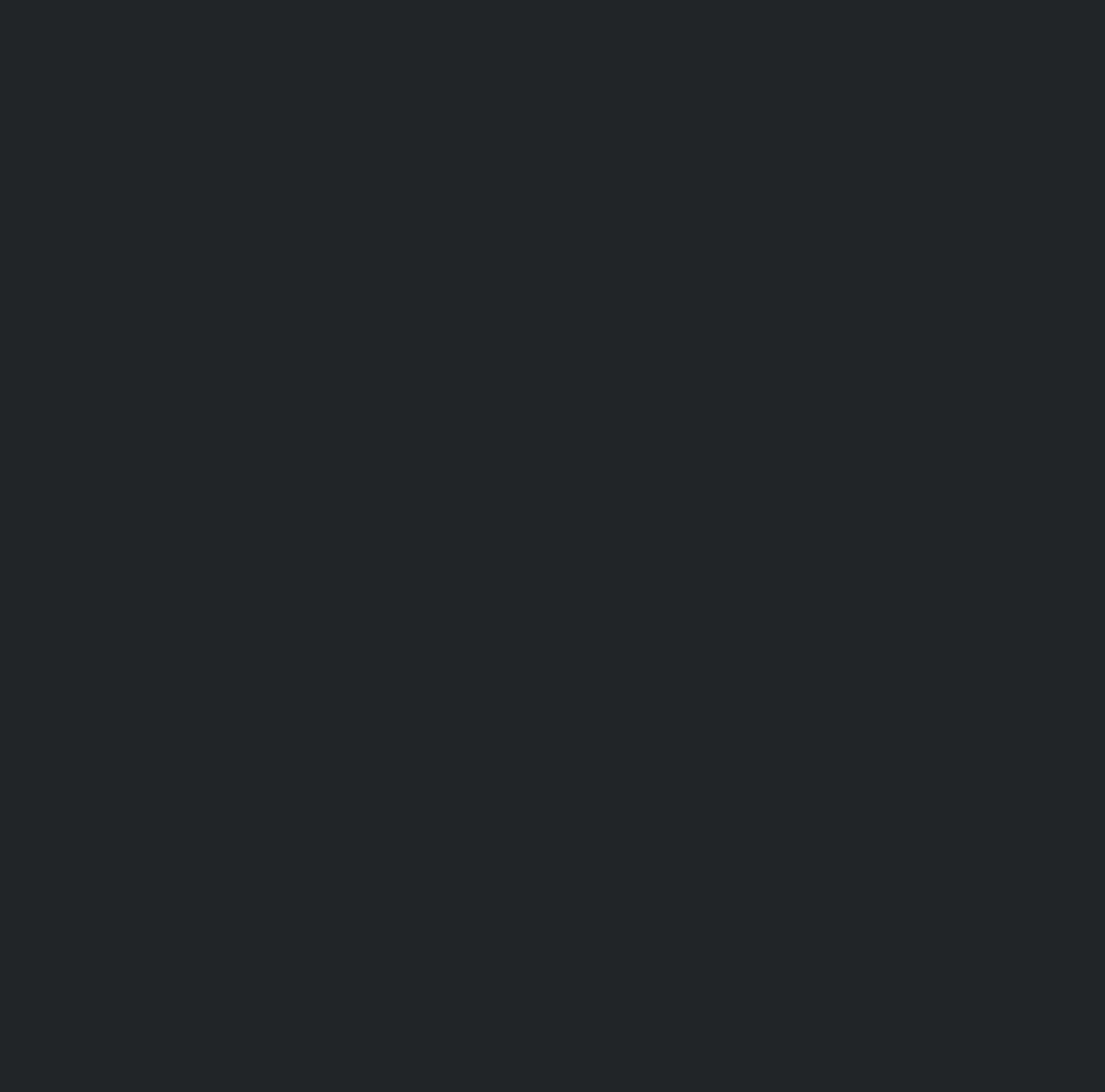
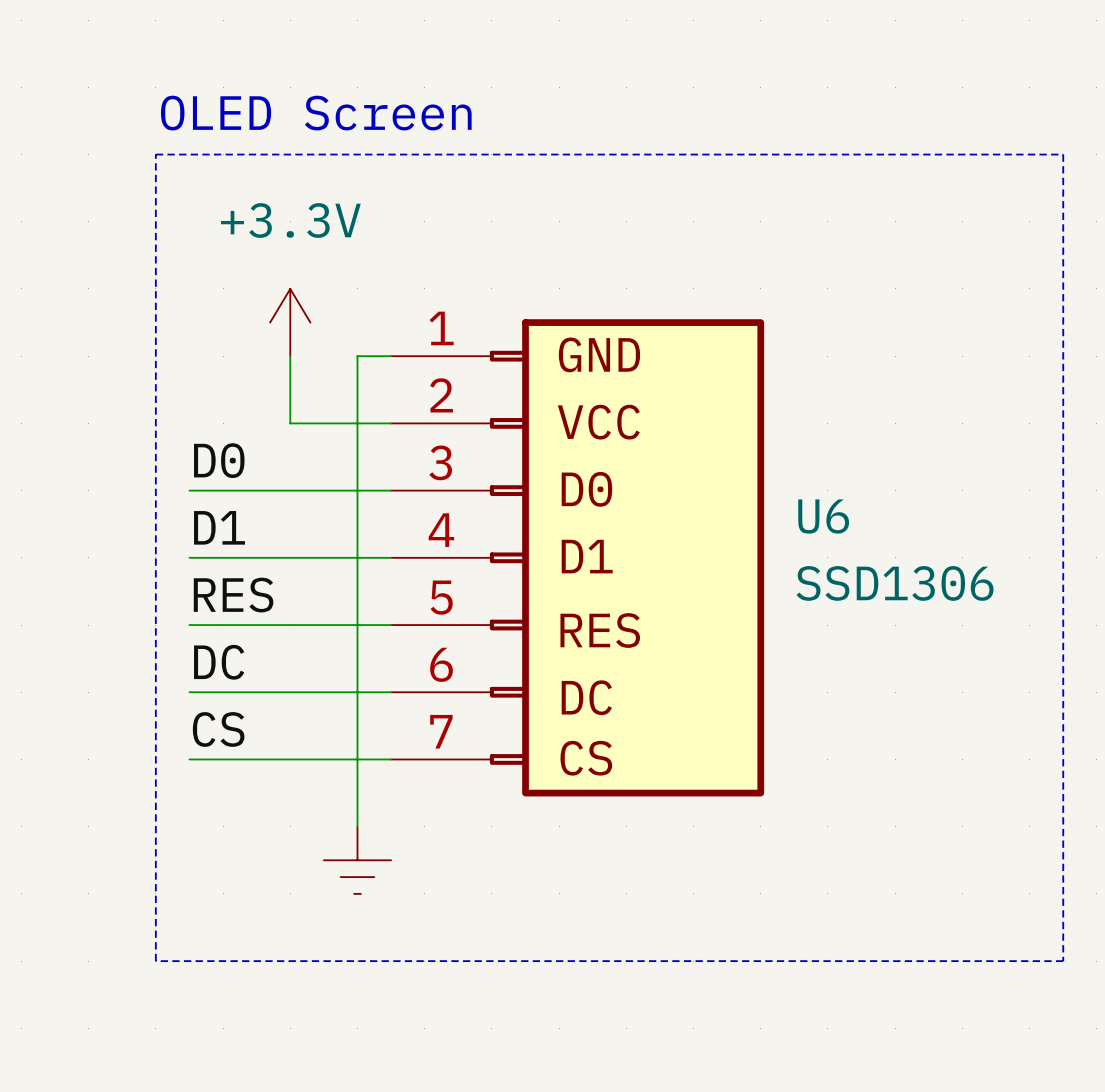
text: none -> OLED Screen (316, 113)
line: none -> (155, 154) (1063, 154) (1063, 961) (155, 961) (155, 154)
power symbol: none -> +3.3V (290, 322)
wire: none -> (290, 356) (290, 423) (391, 423)
wire: none -> (391, 356) (357, 356) (357, 826)
label: none -> D0 (219, 460)
wire: none -> (189, 490) (391, 490)
label: none -> D1 (219, 527)
wire: none -> (189, 557) (391, 557)
U6: none -> SSD1306 (577, 557)
label: none -> RES (233, 595)
wire: none -> (189, 625) (391, 625)
label: none -> DC (219, 662)
wire: none -> (189, 692) (391, 692)
label: none -> CS (218, 729)
wire: none -> (189, 759) (391, 759)
power symbol: none -> (357, 860)

